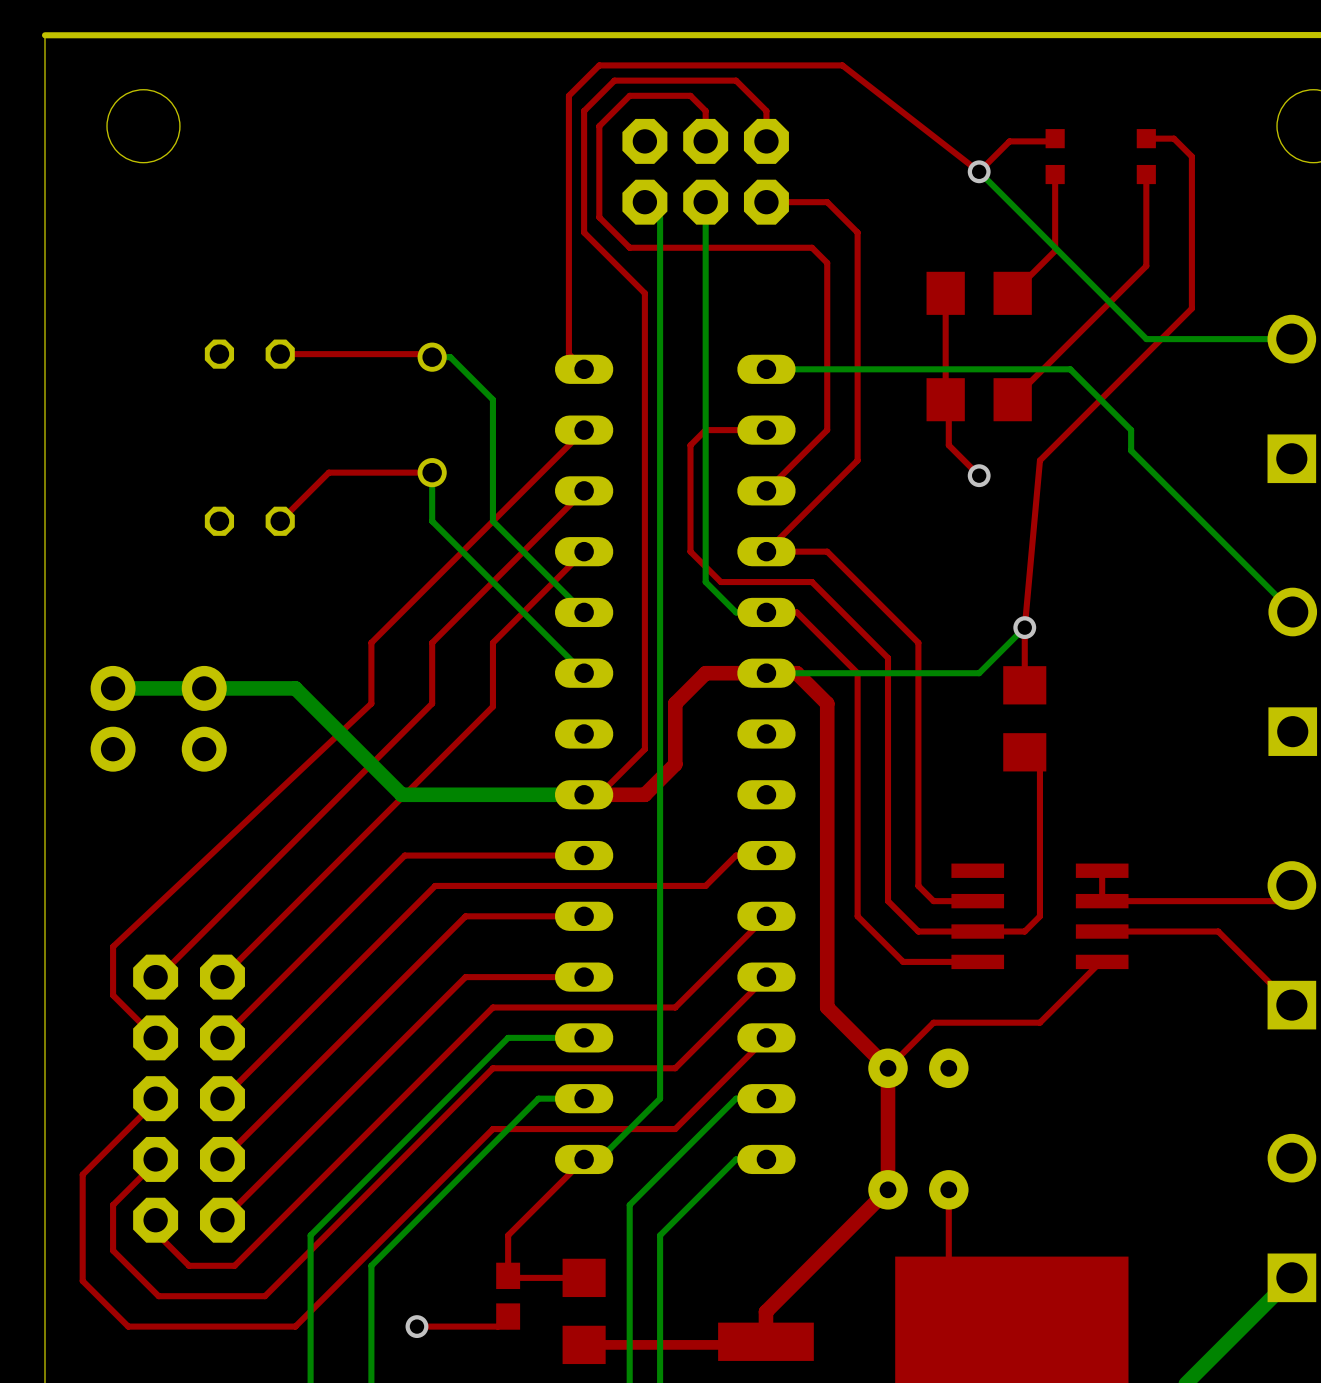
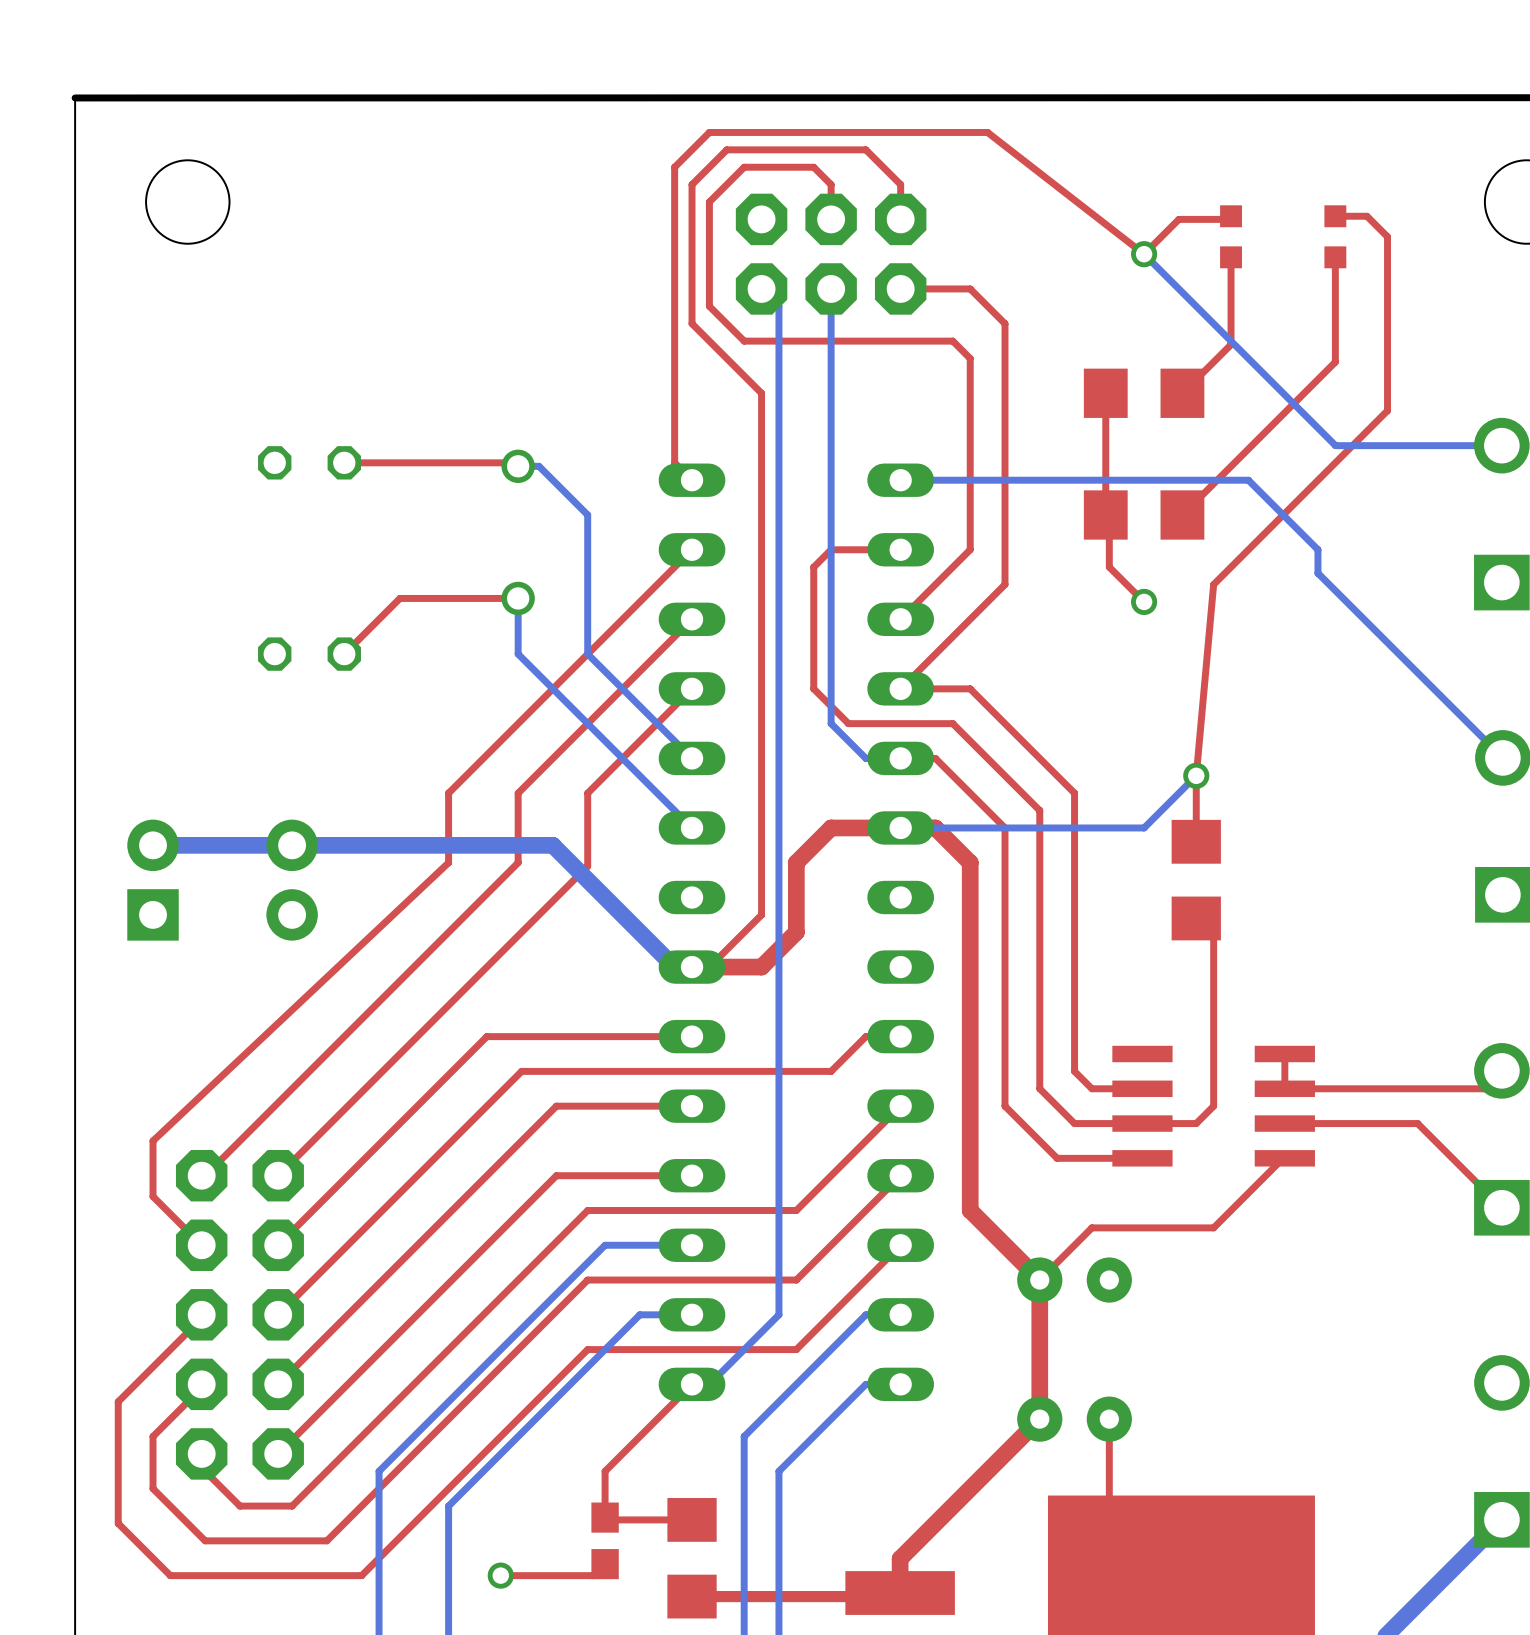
part footprint: [90, 665, 136, 772] -> [127, 819, 179, 941]
bottom track: (295, 688) (401, 794) (568, 794) -> (361, 845) (552, 845) (674, 967)
part position: (204, 718) -> (292, 880)

